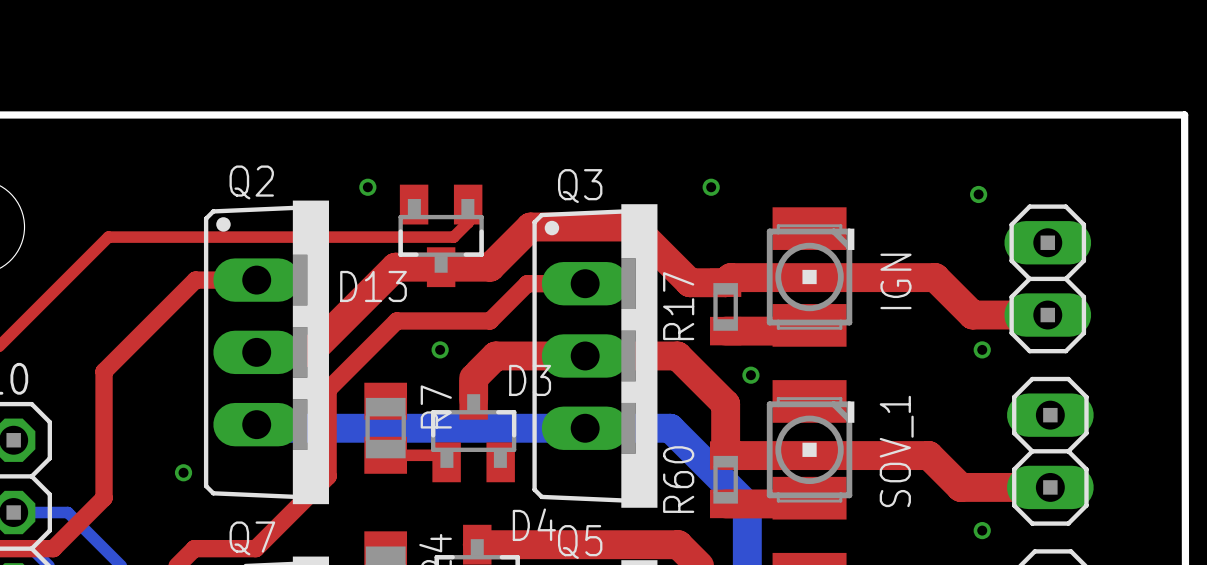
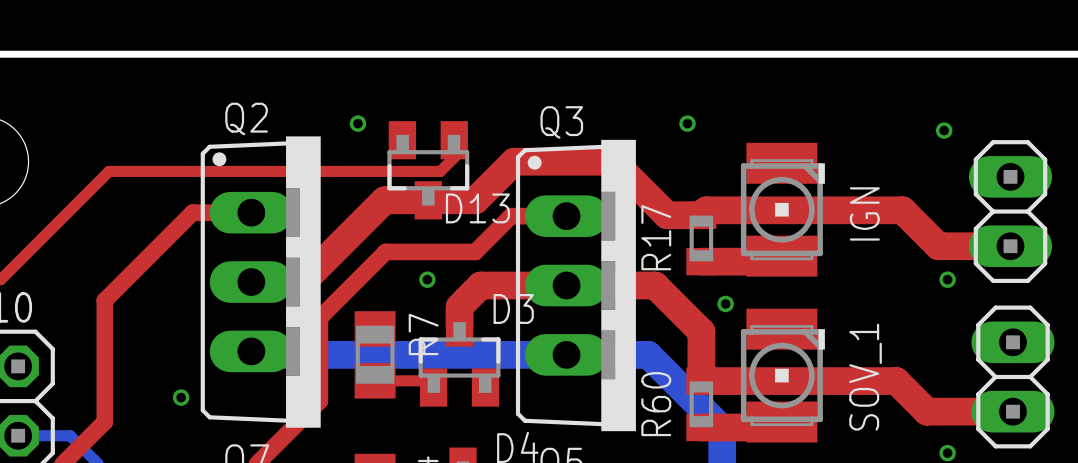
D13 name position: D13 (373, 286) -> D13 (477, 208)

